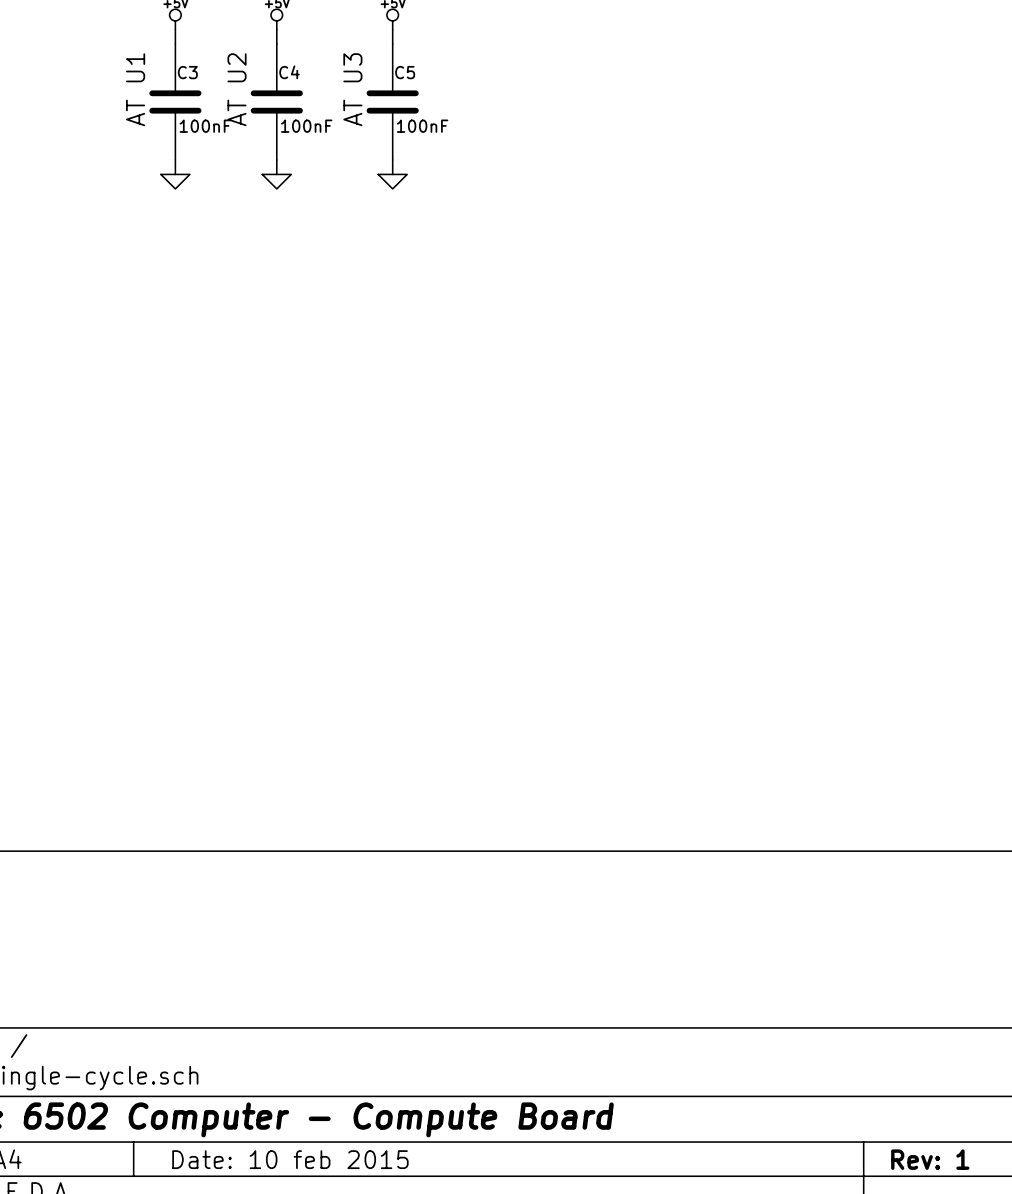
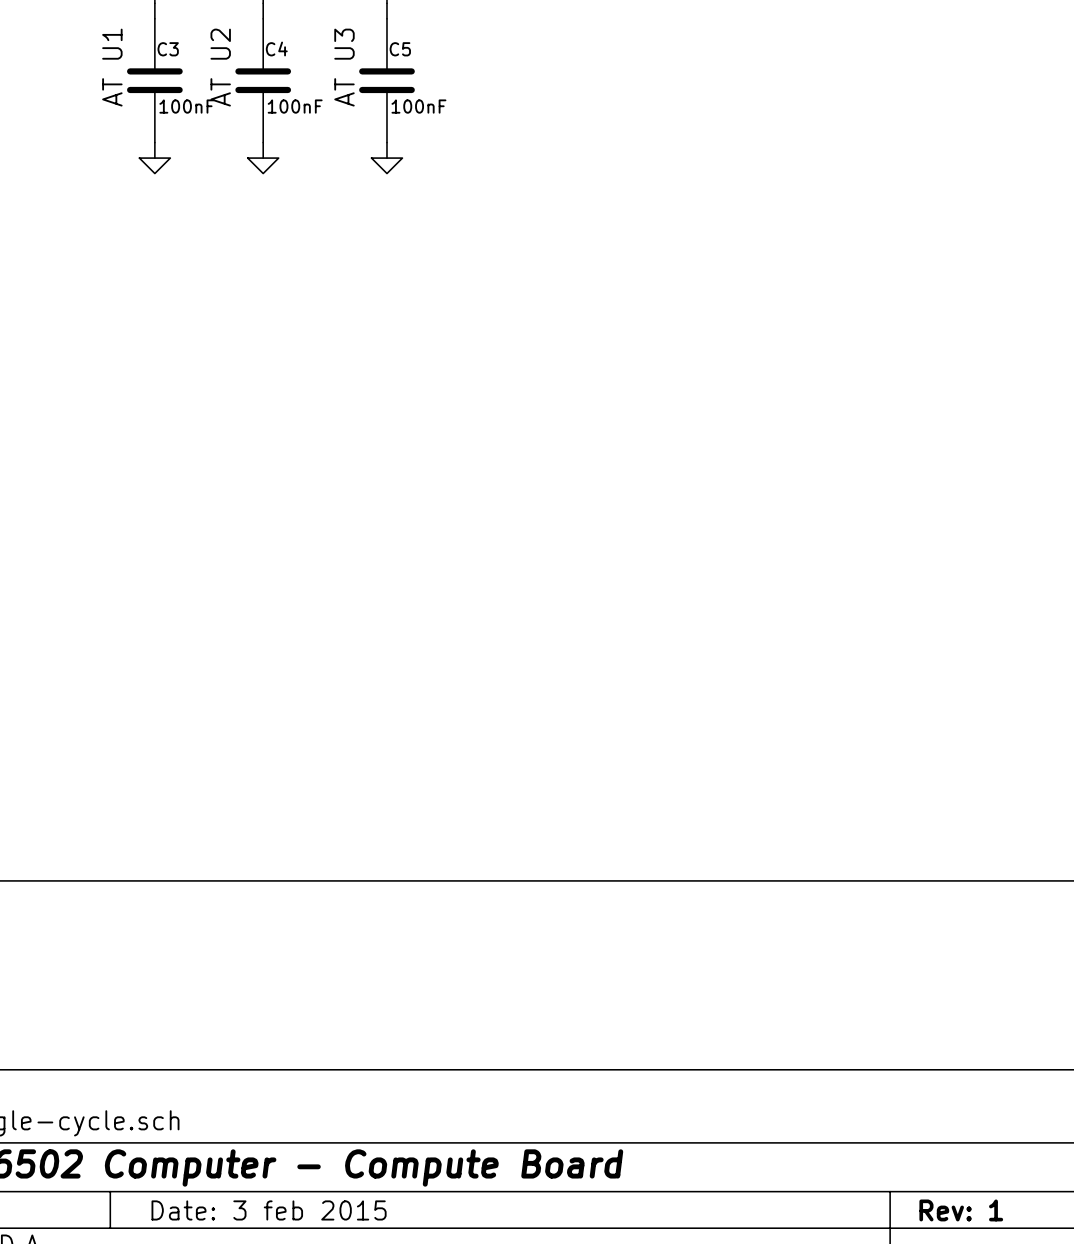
title block: Date: 10 feb 2015 (290, 1159) -> Date: 3 feb 2015 (269, 1210)

